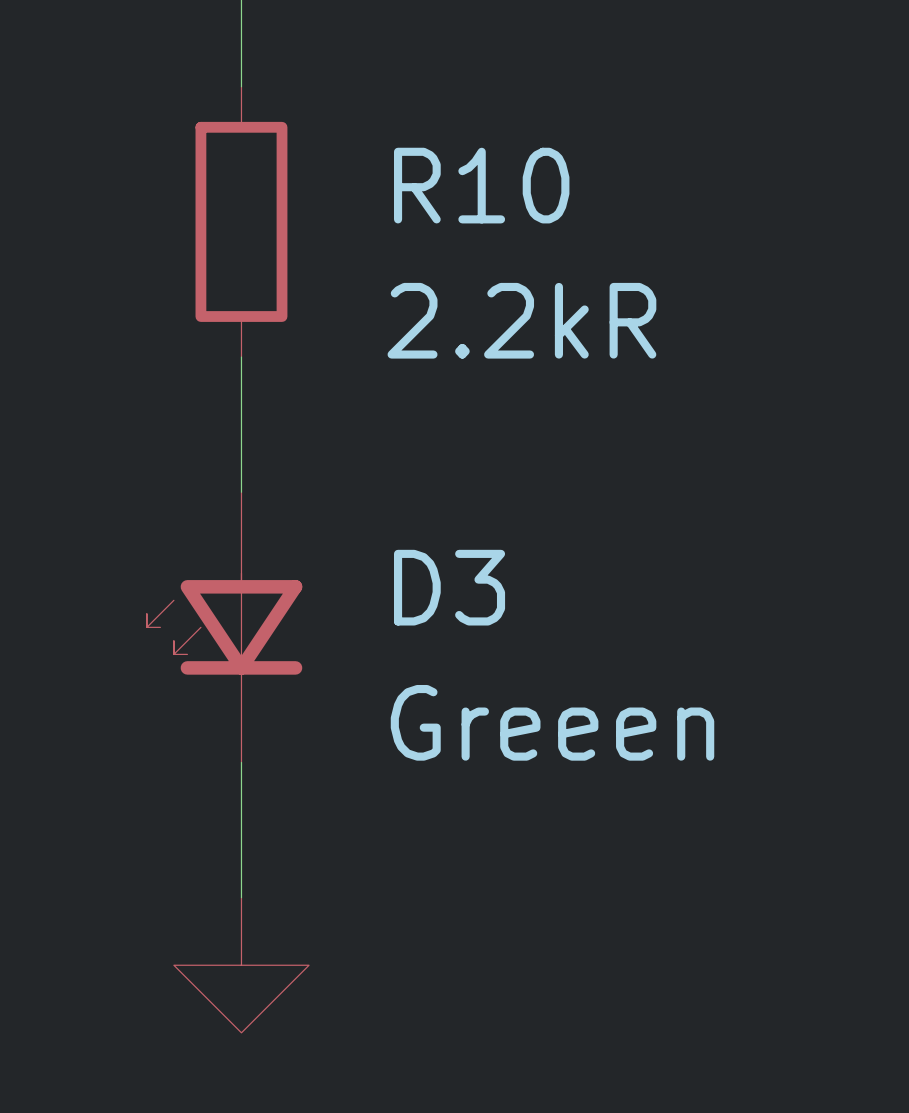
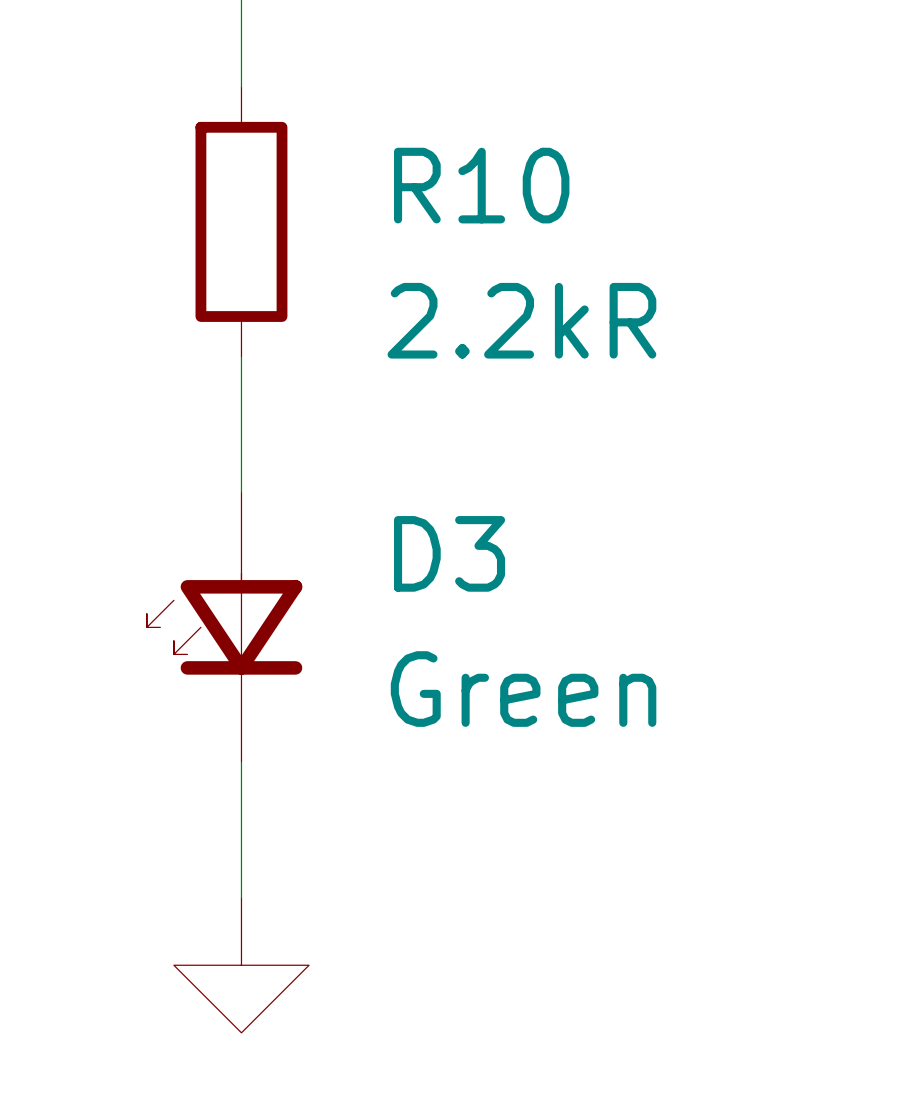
D3 name position: D3 (449, 587) -> D3 (449, 553)
D3 value: Greeen (552, 722) -> Green (523, 689)

